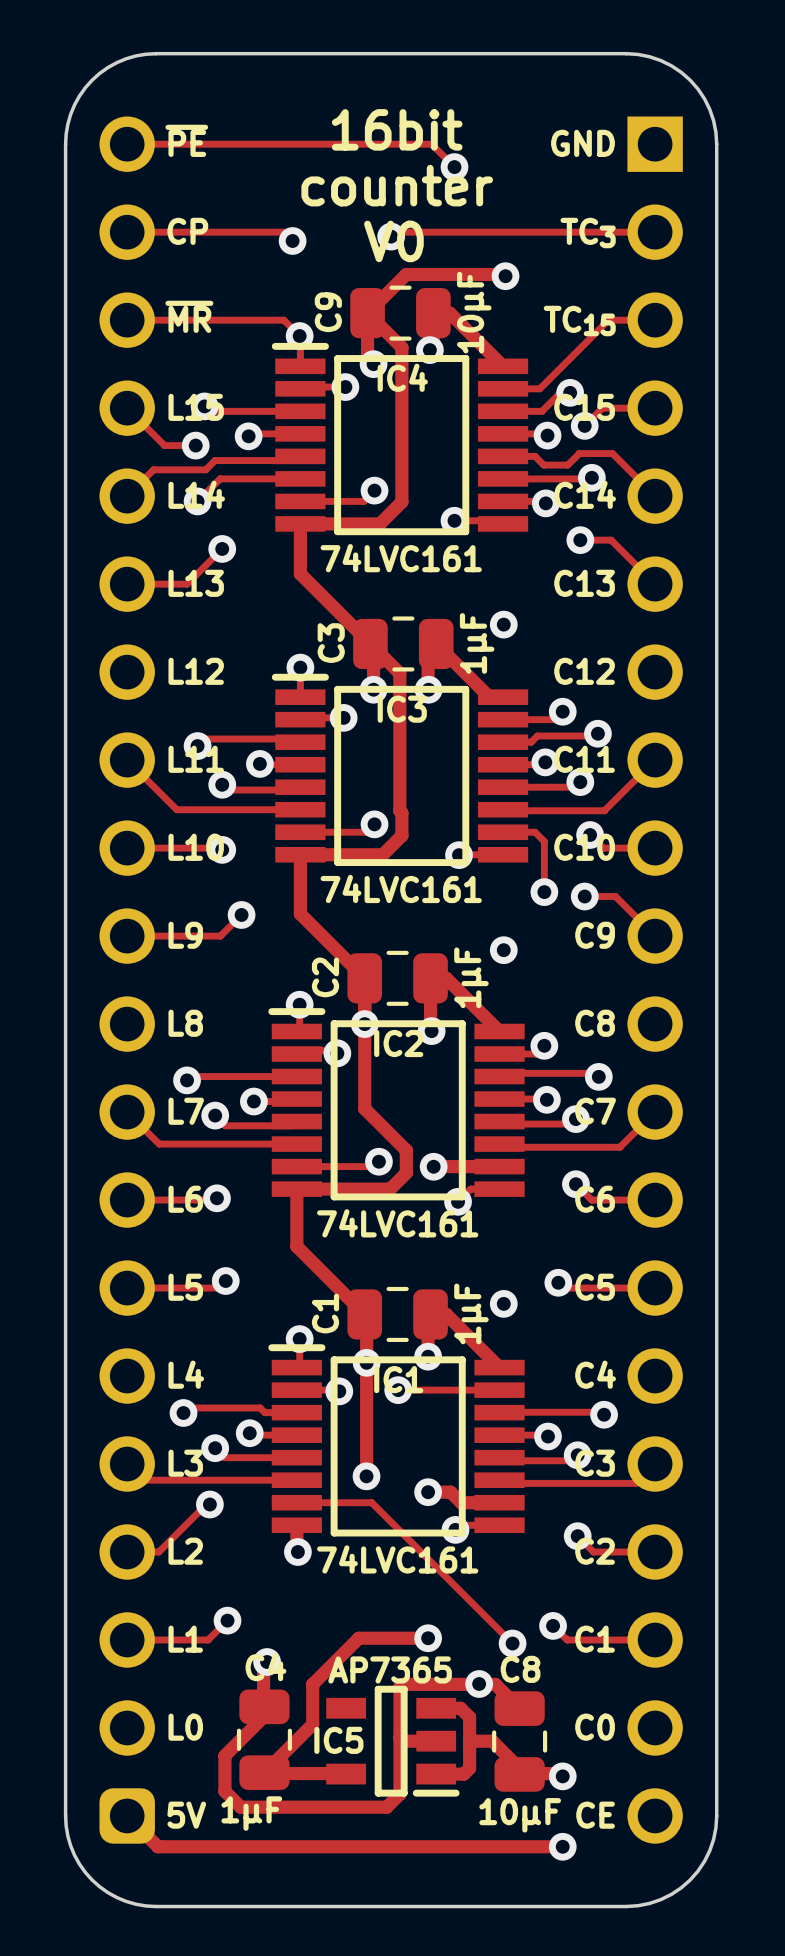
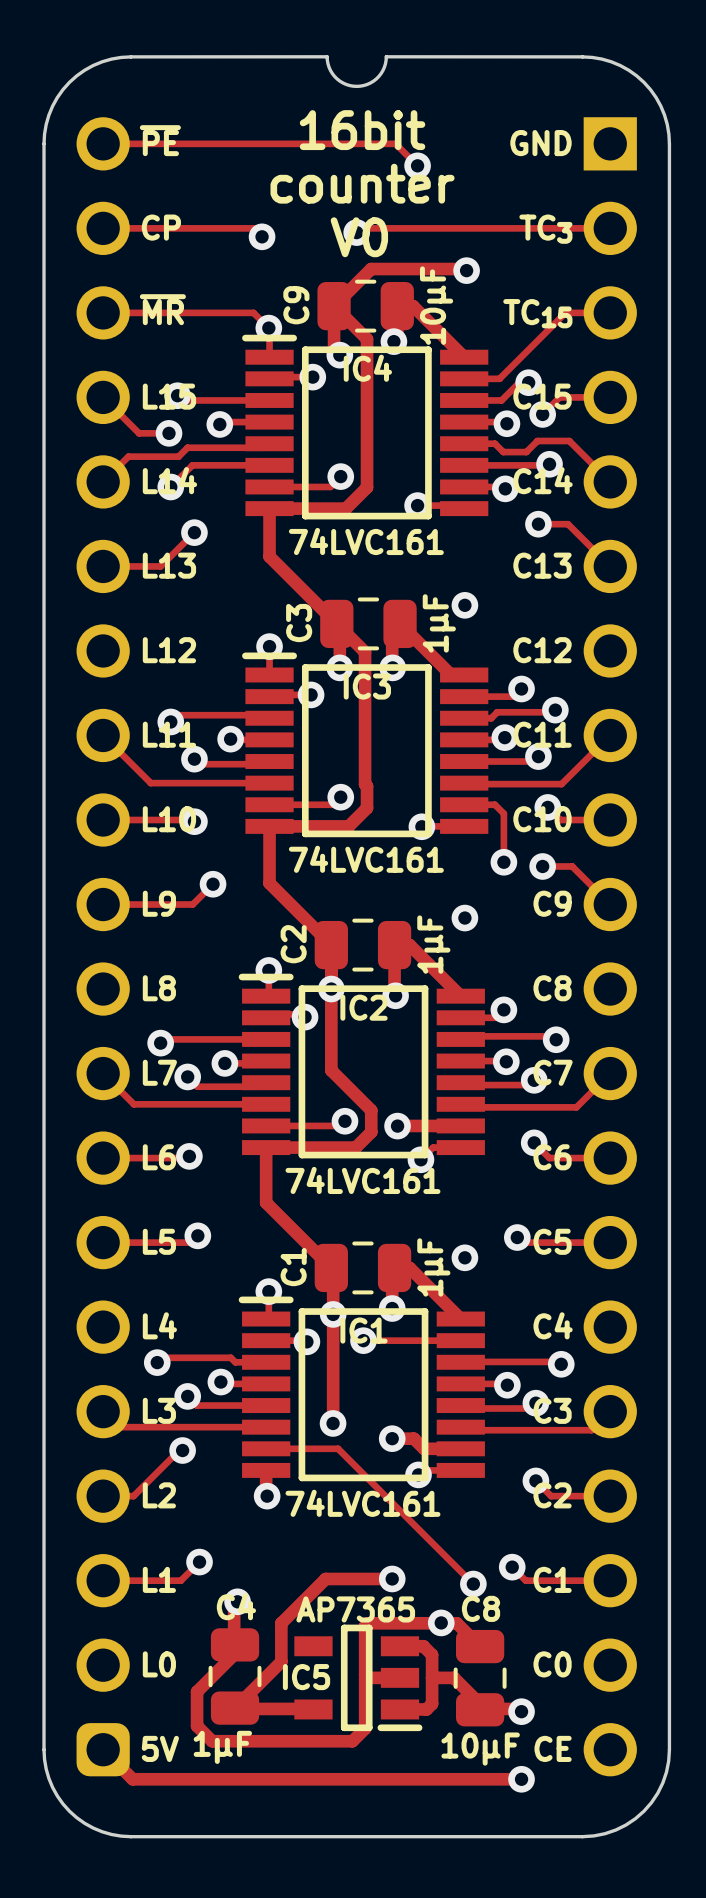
part footprint: [63, 51, 719, 1909] -> [42, 55, 672, 1839]

